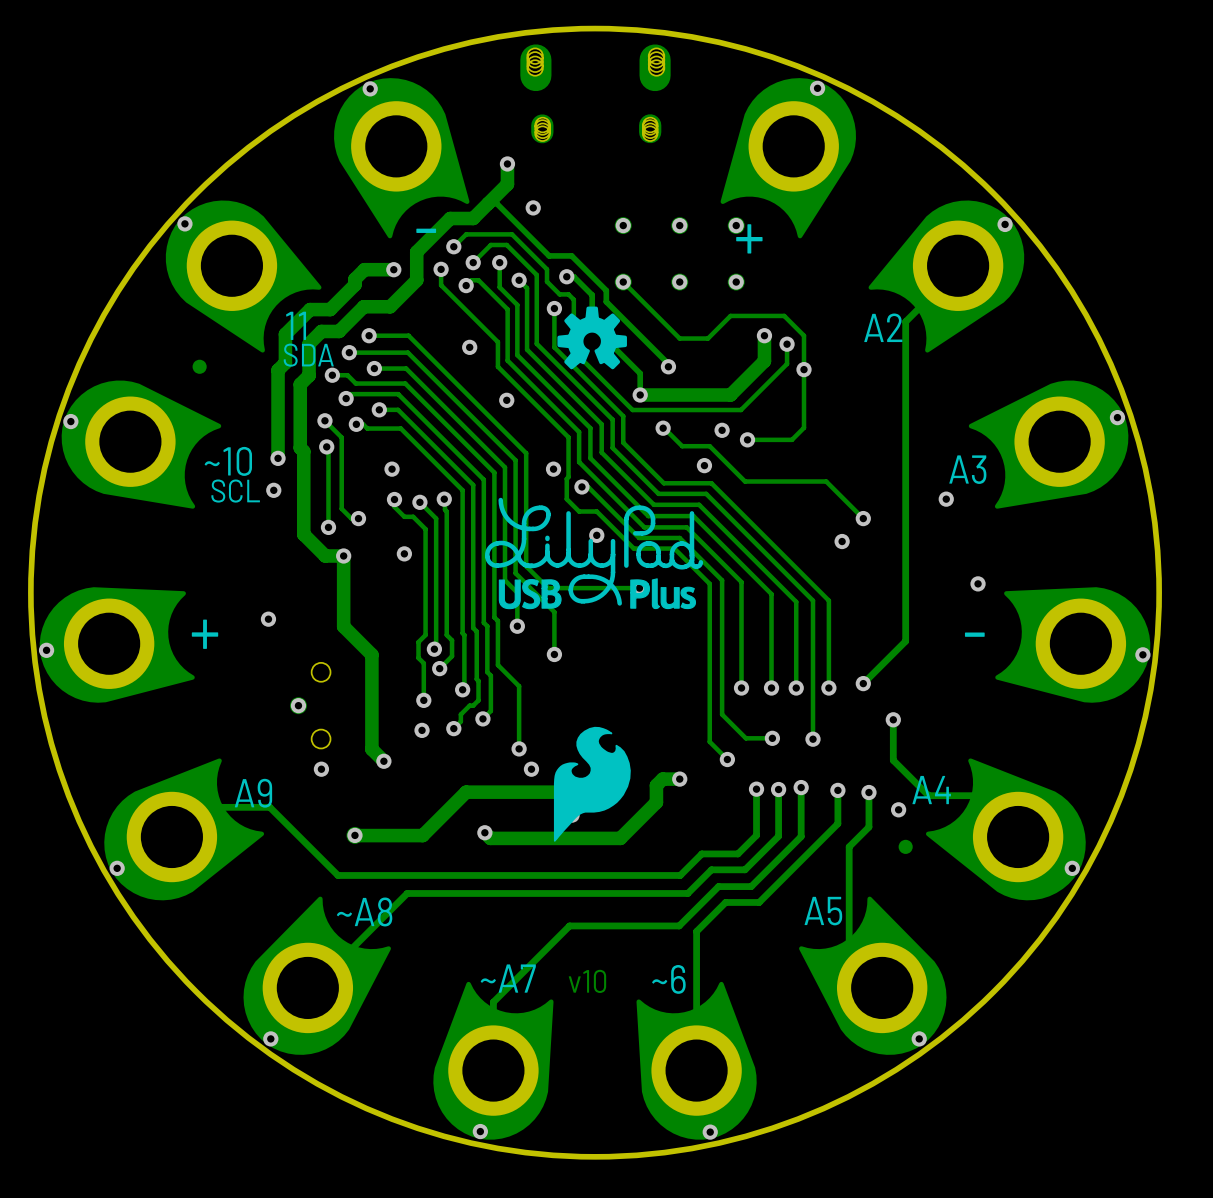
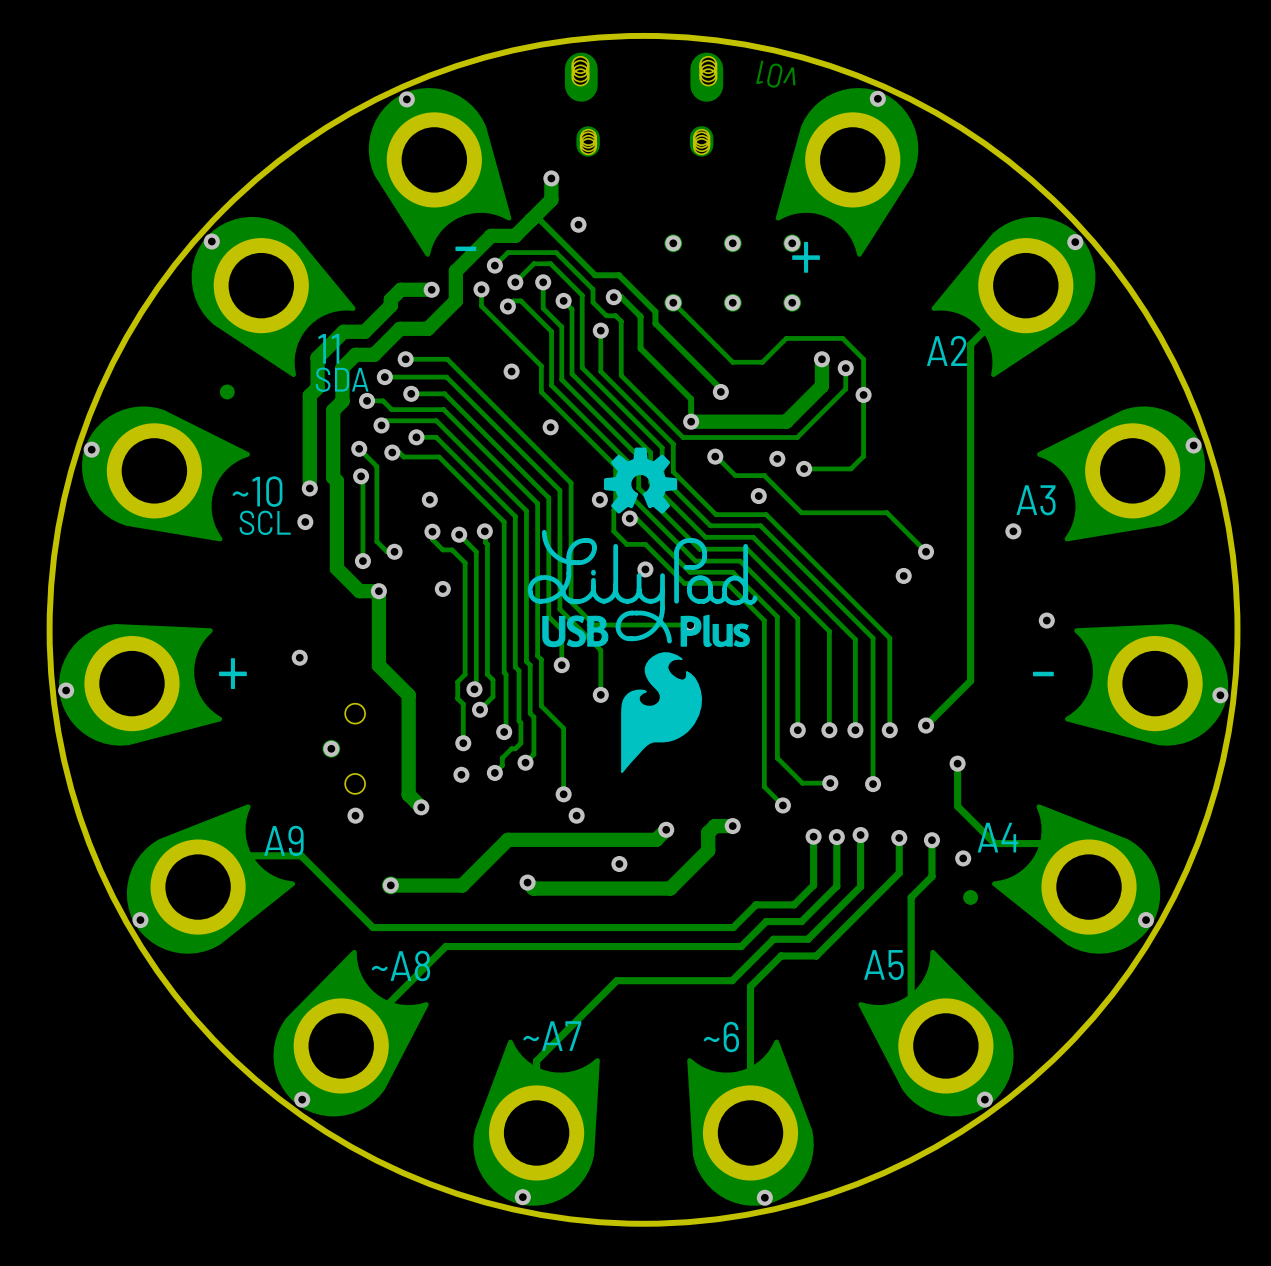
text: none -> v01 (775, 74)
drawing position: (592, 337) -> (640, 480)
drawing position: (592, 784) -> (661, 712)
text: v10 (587, 981) -> none

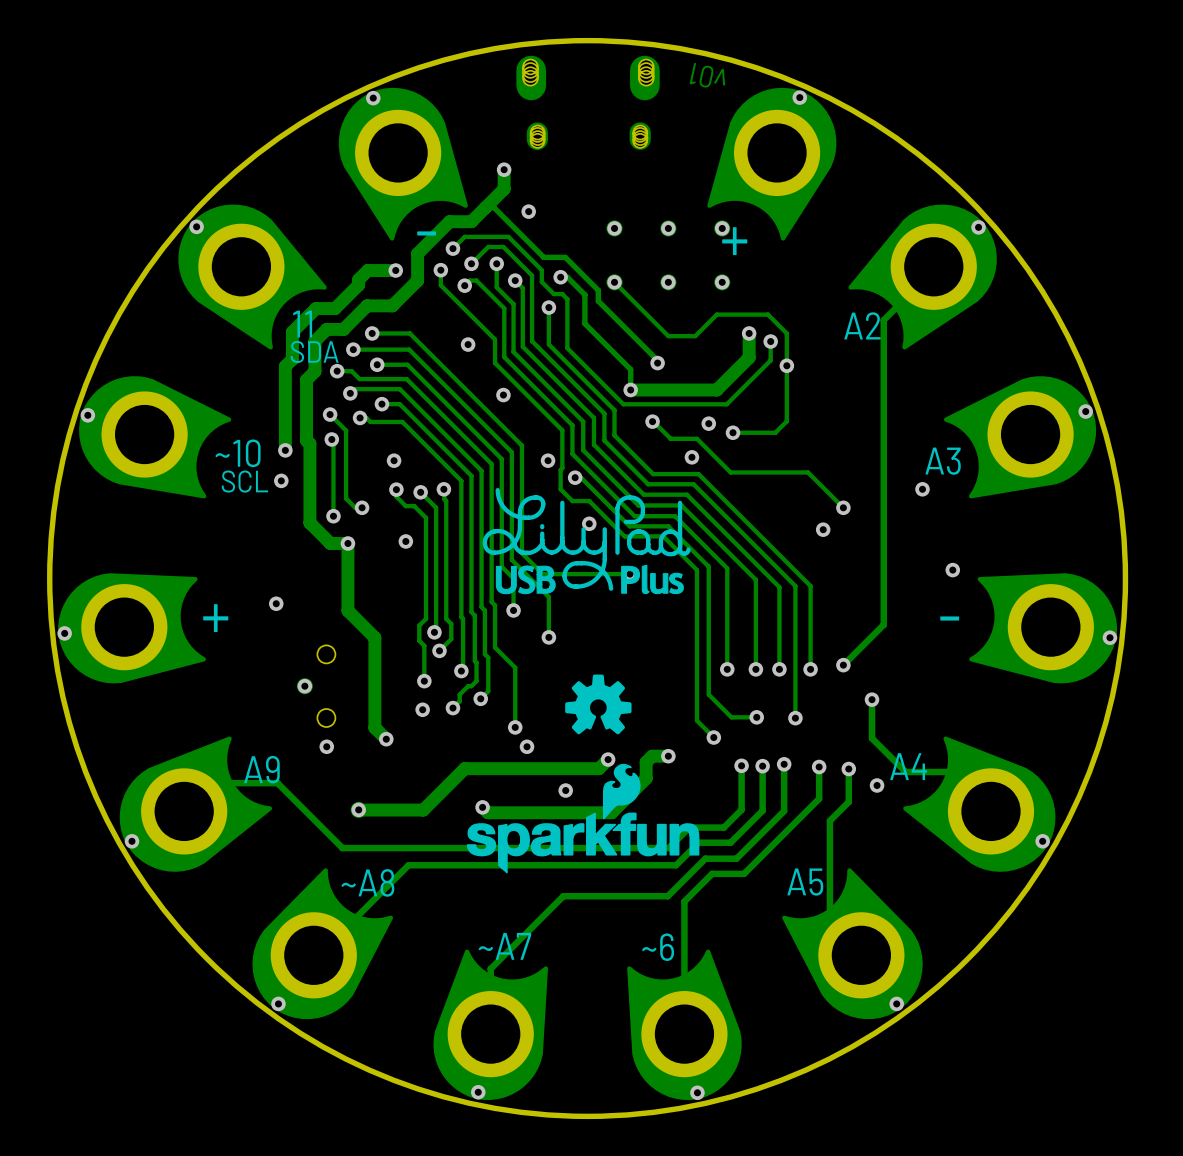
part: (227, 391) -> none
drawing position: (640, 480) -> (598, 704)
drawing: [621, 652, 703, 774] -> none
drawing: none -> [466, 763, 700, 874]
part: (970, 897) -> none

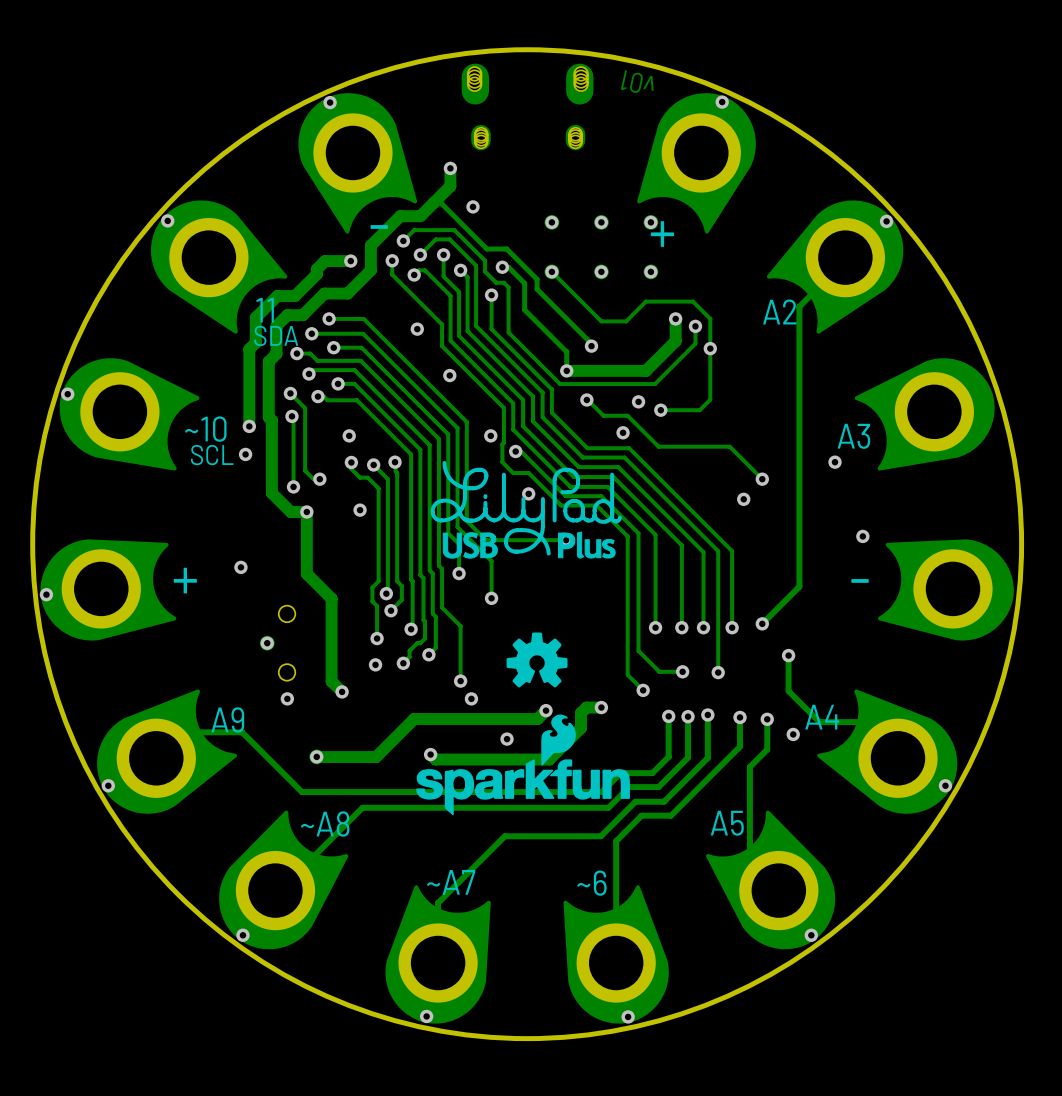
via: (1085, 411) -> none
via: (1109, 637) -> none

